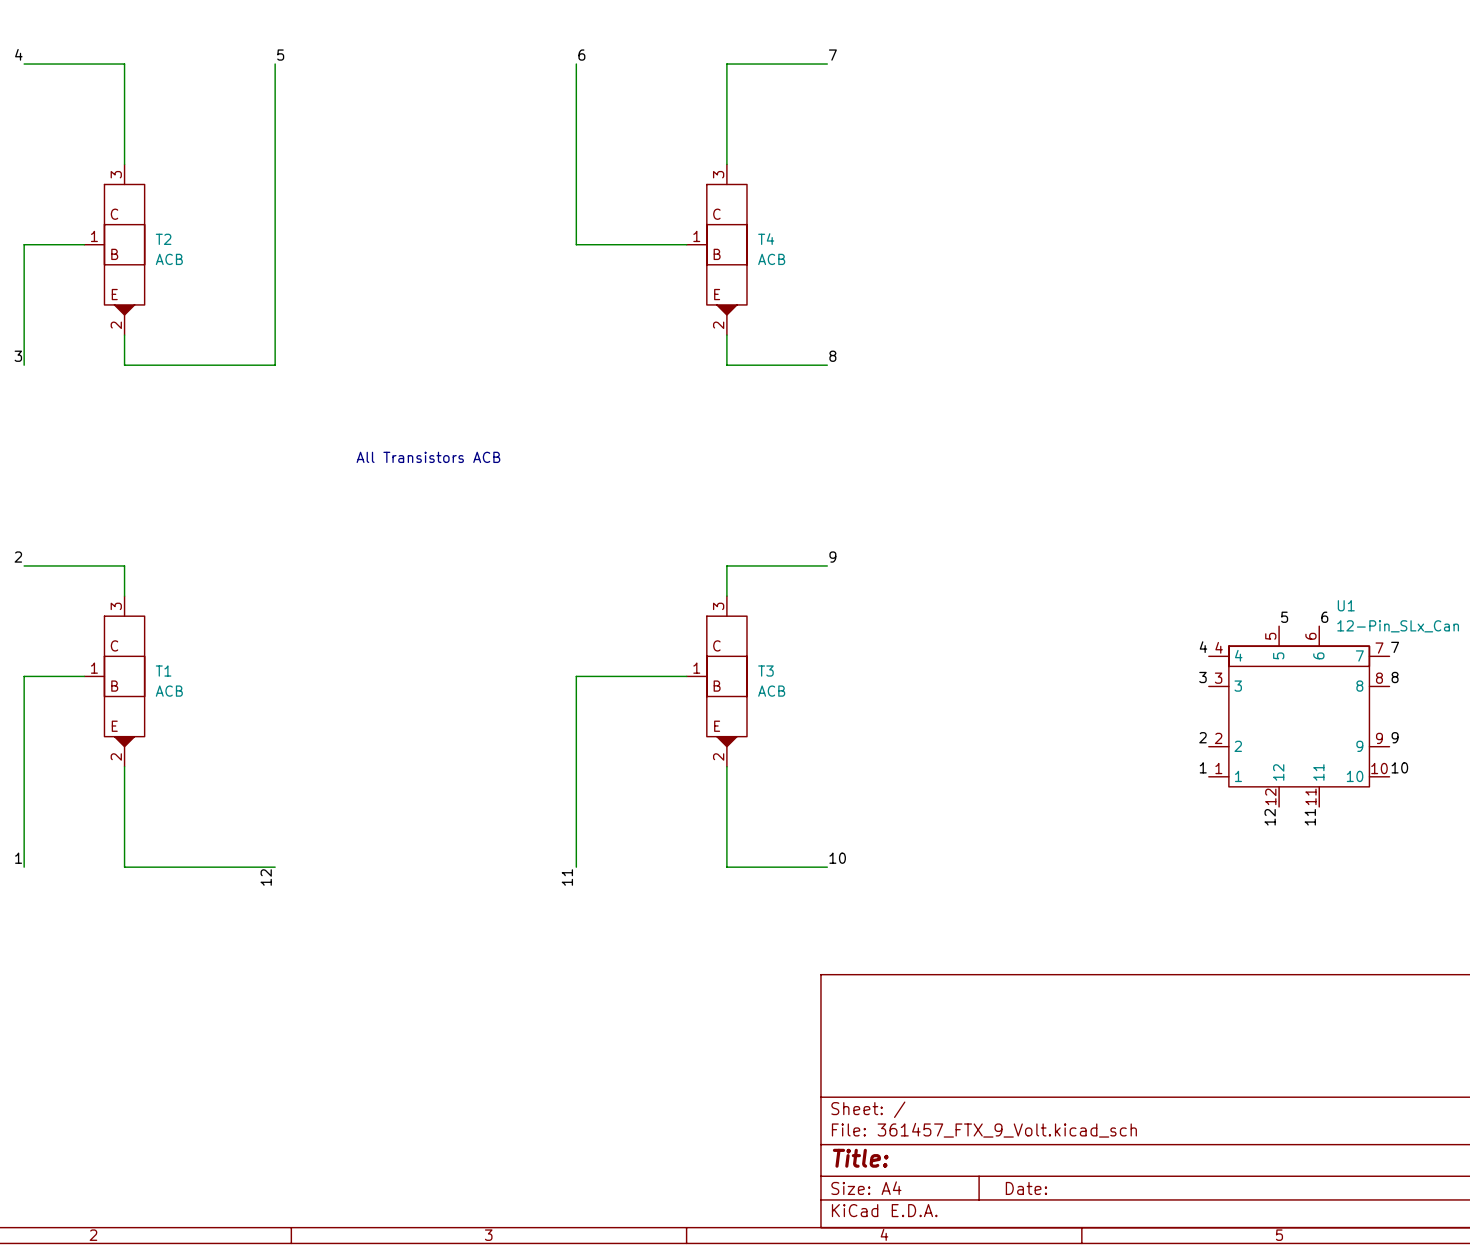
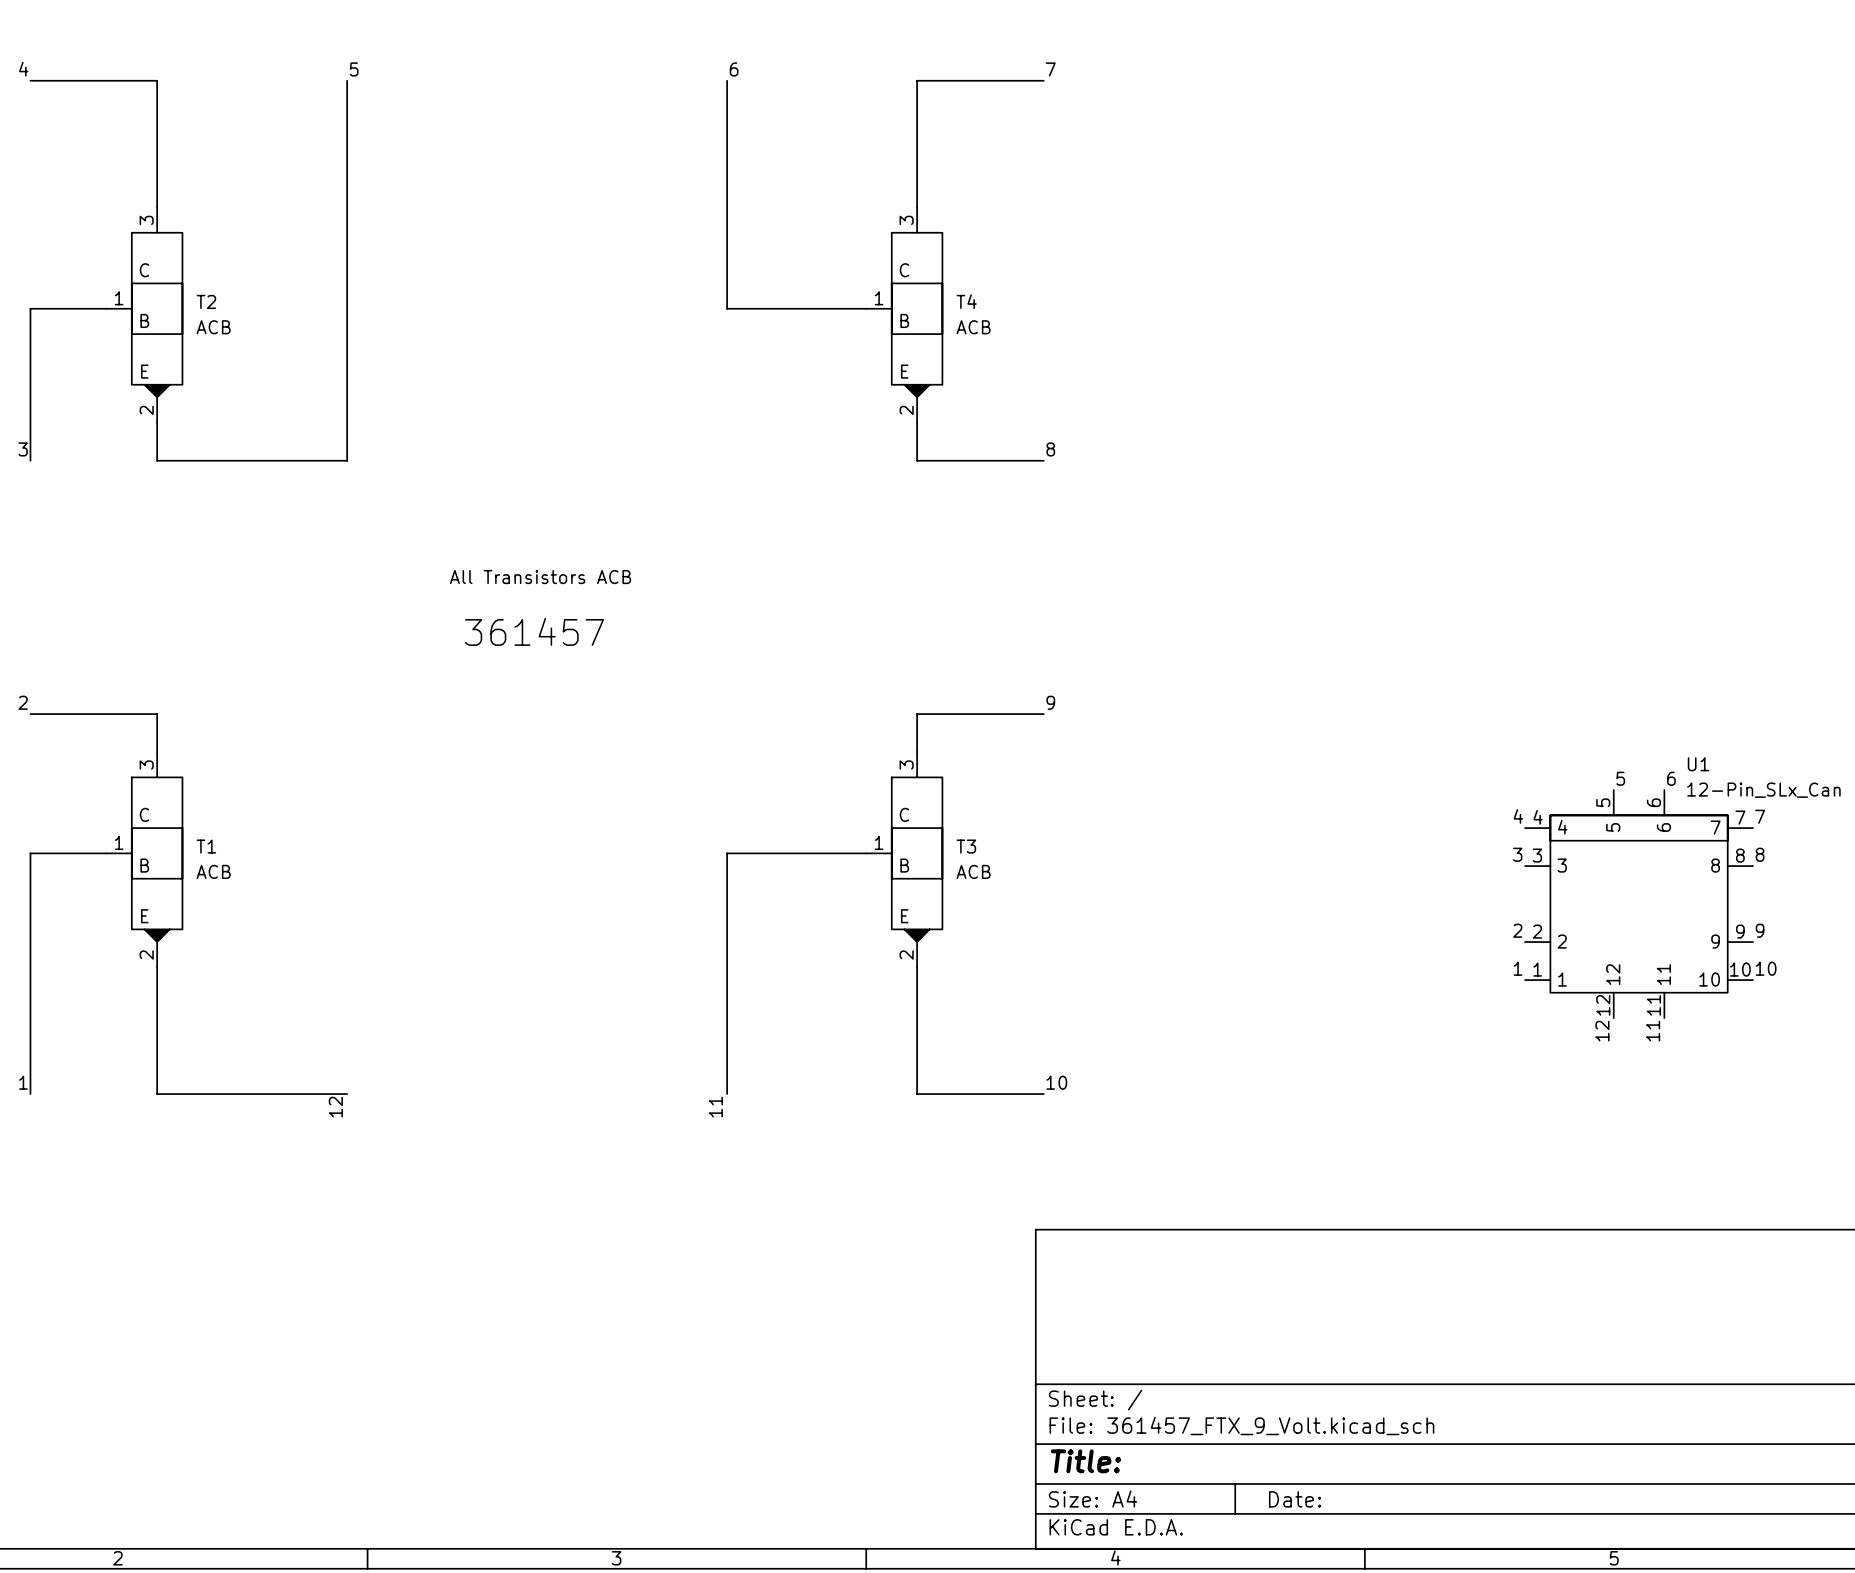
text: none -> 361457 (534, 631)

